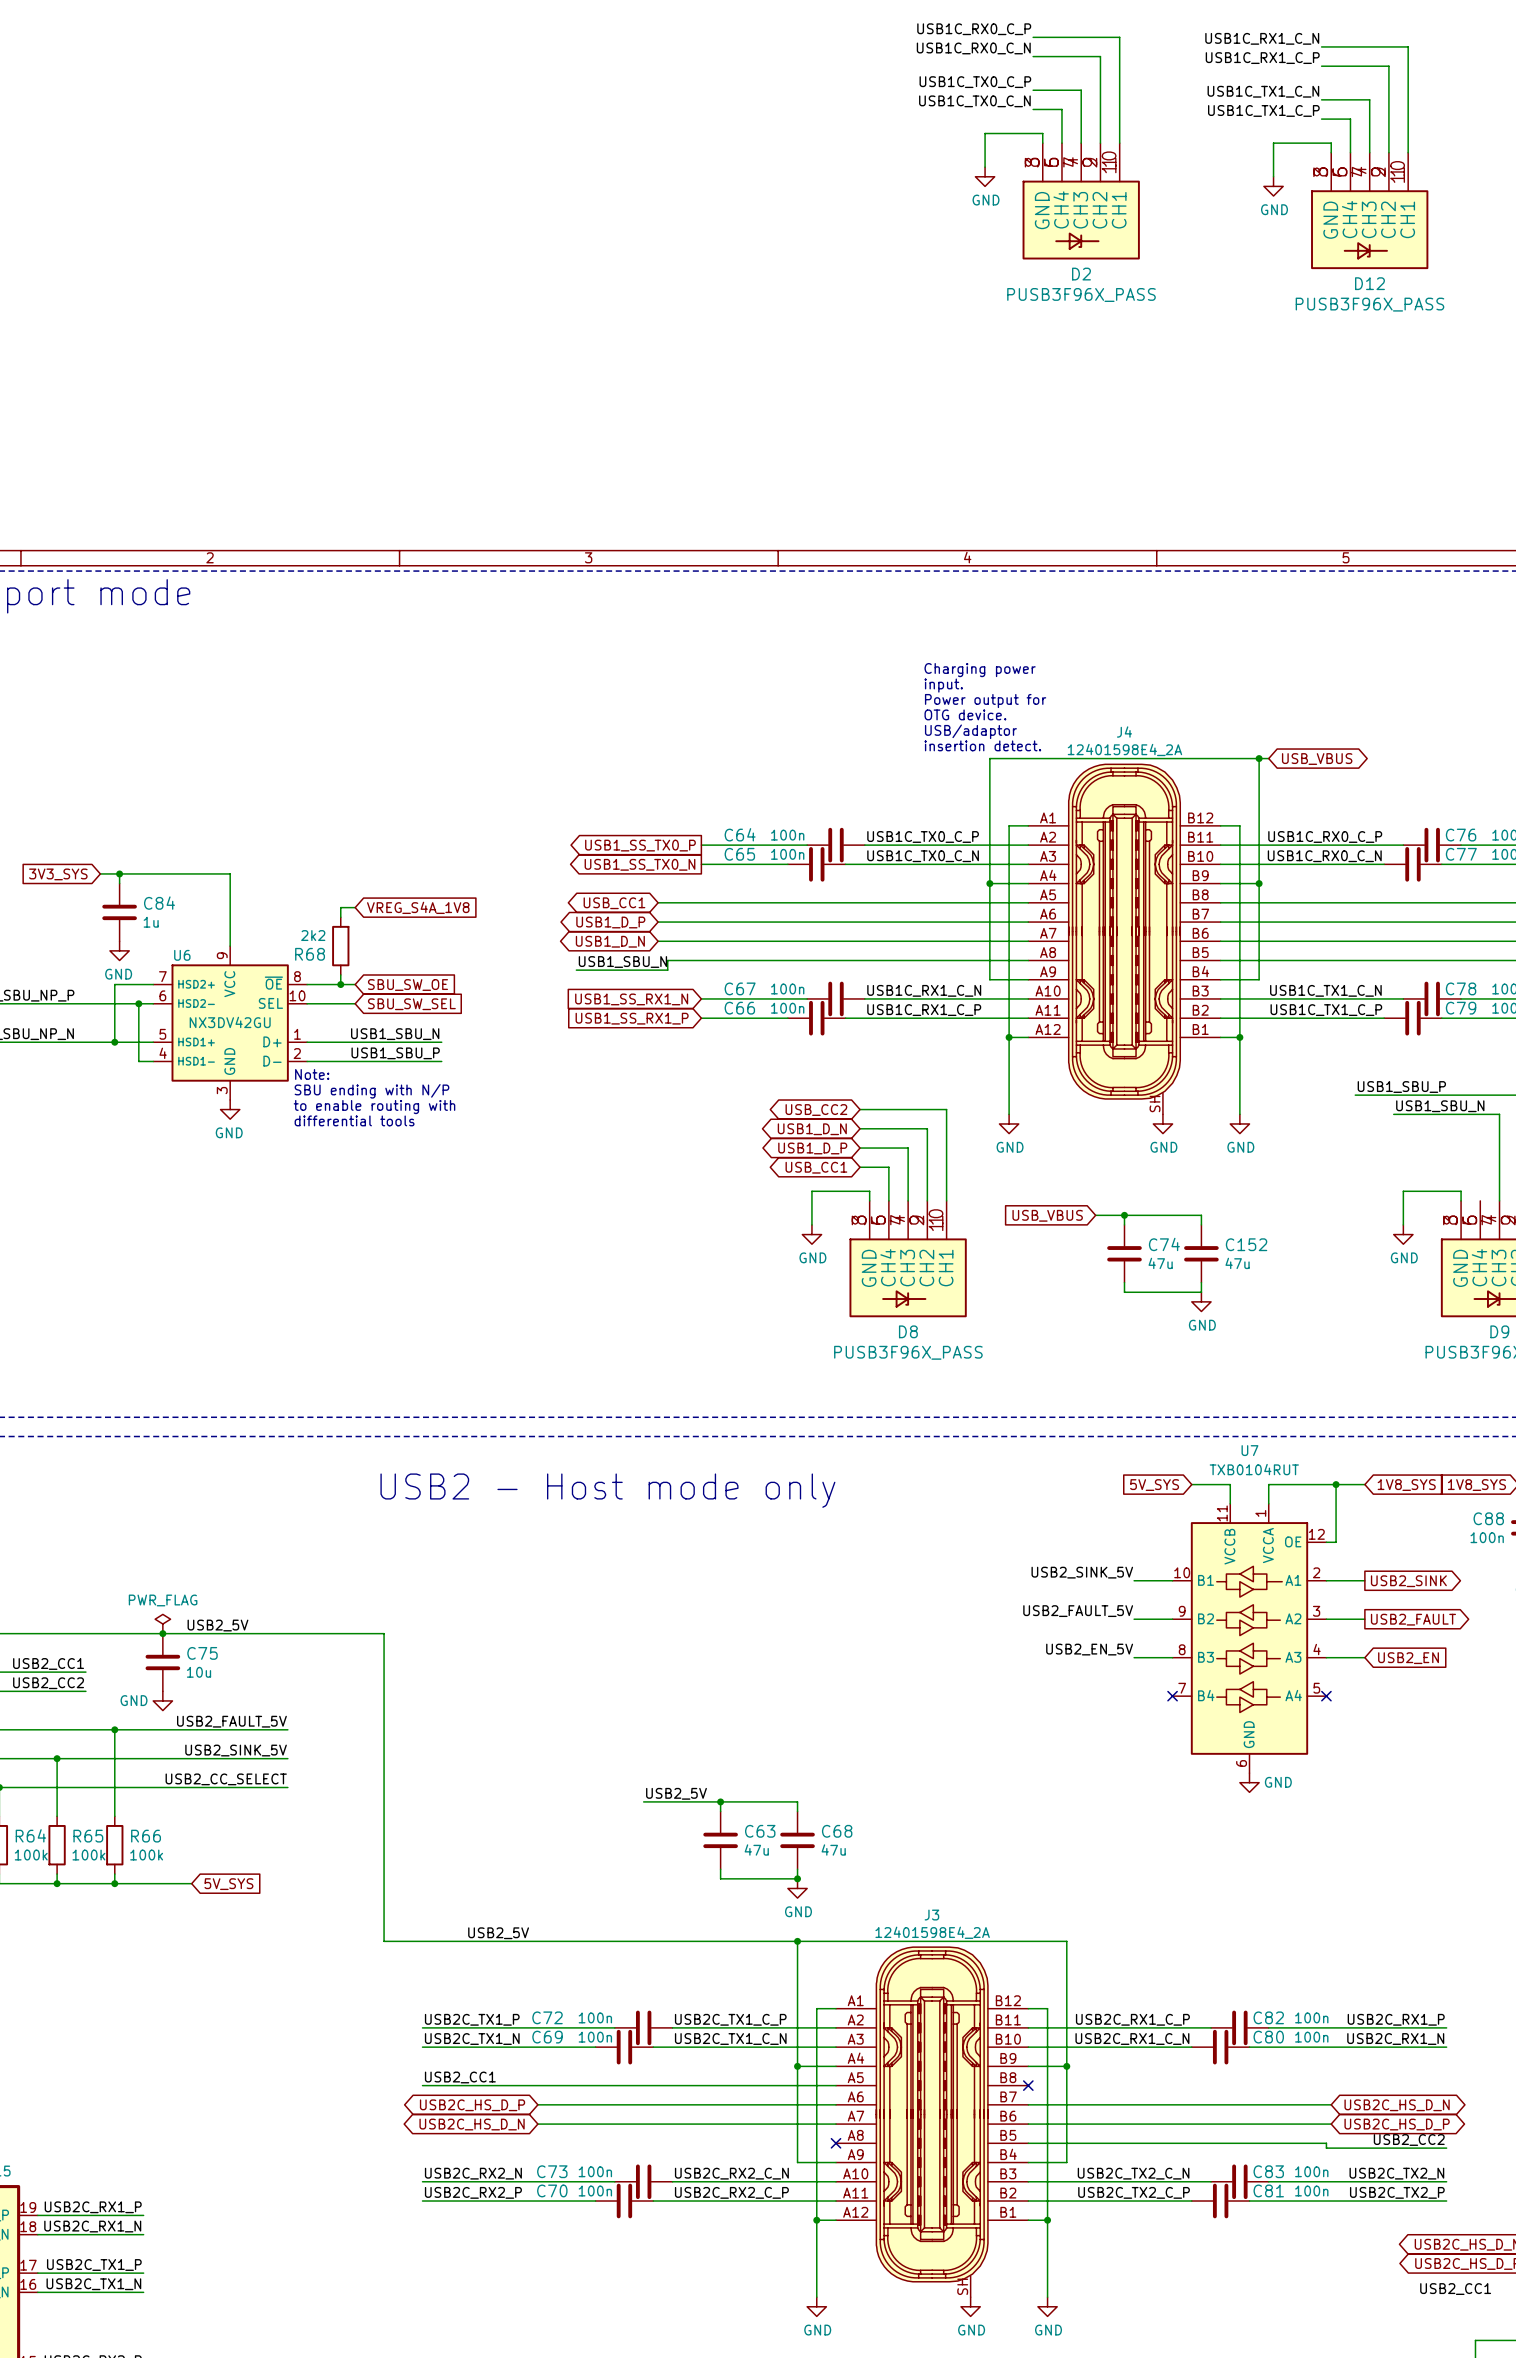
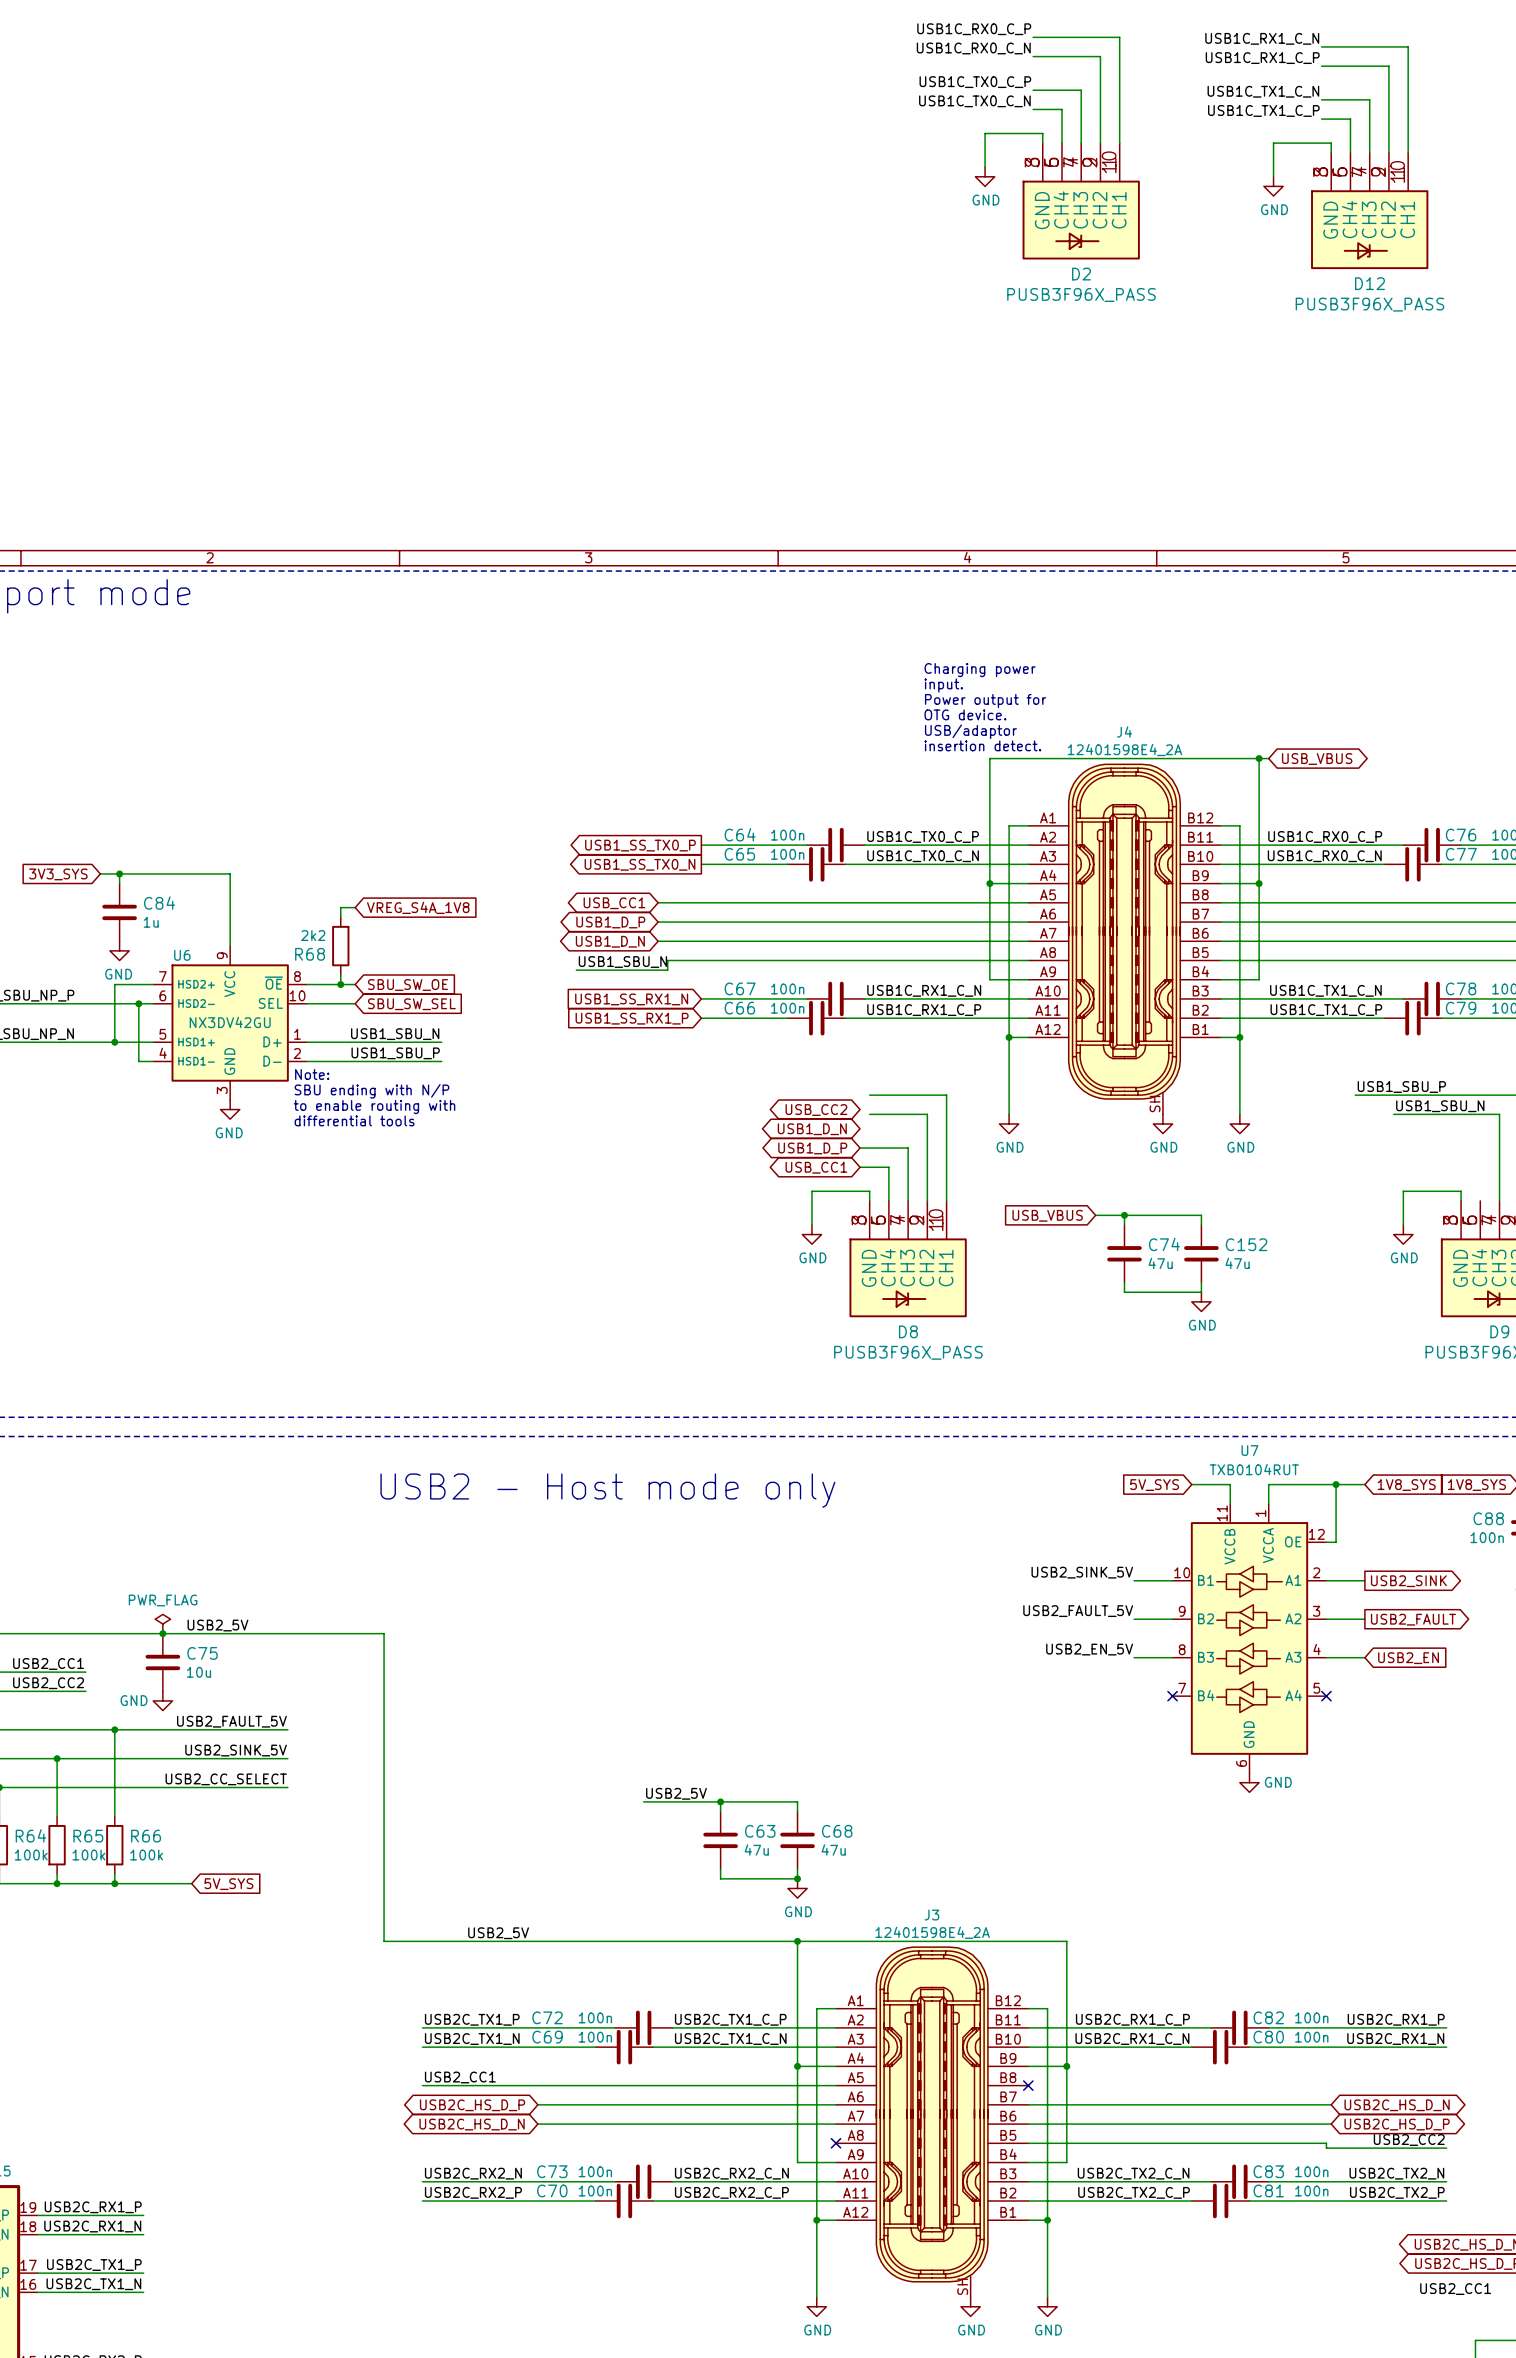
wire: (860, 1109) (946, 1109) -> (869, 1095) (946, 1095) (946, 1109)
wire: (860, 1128) (927, 1128) -> (869, 1114) (927, 1114) (927, 1128)

